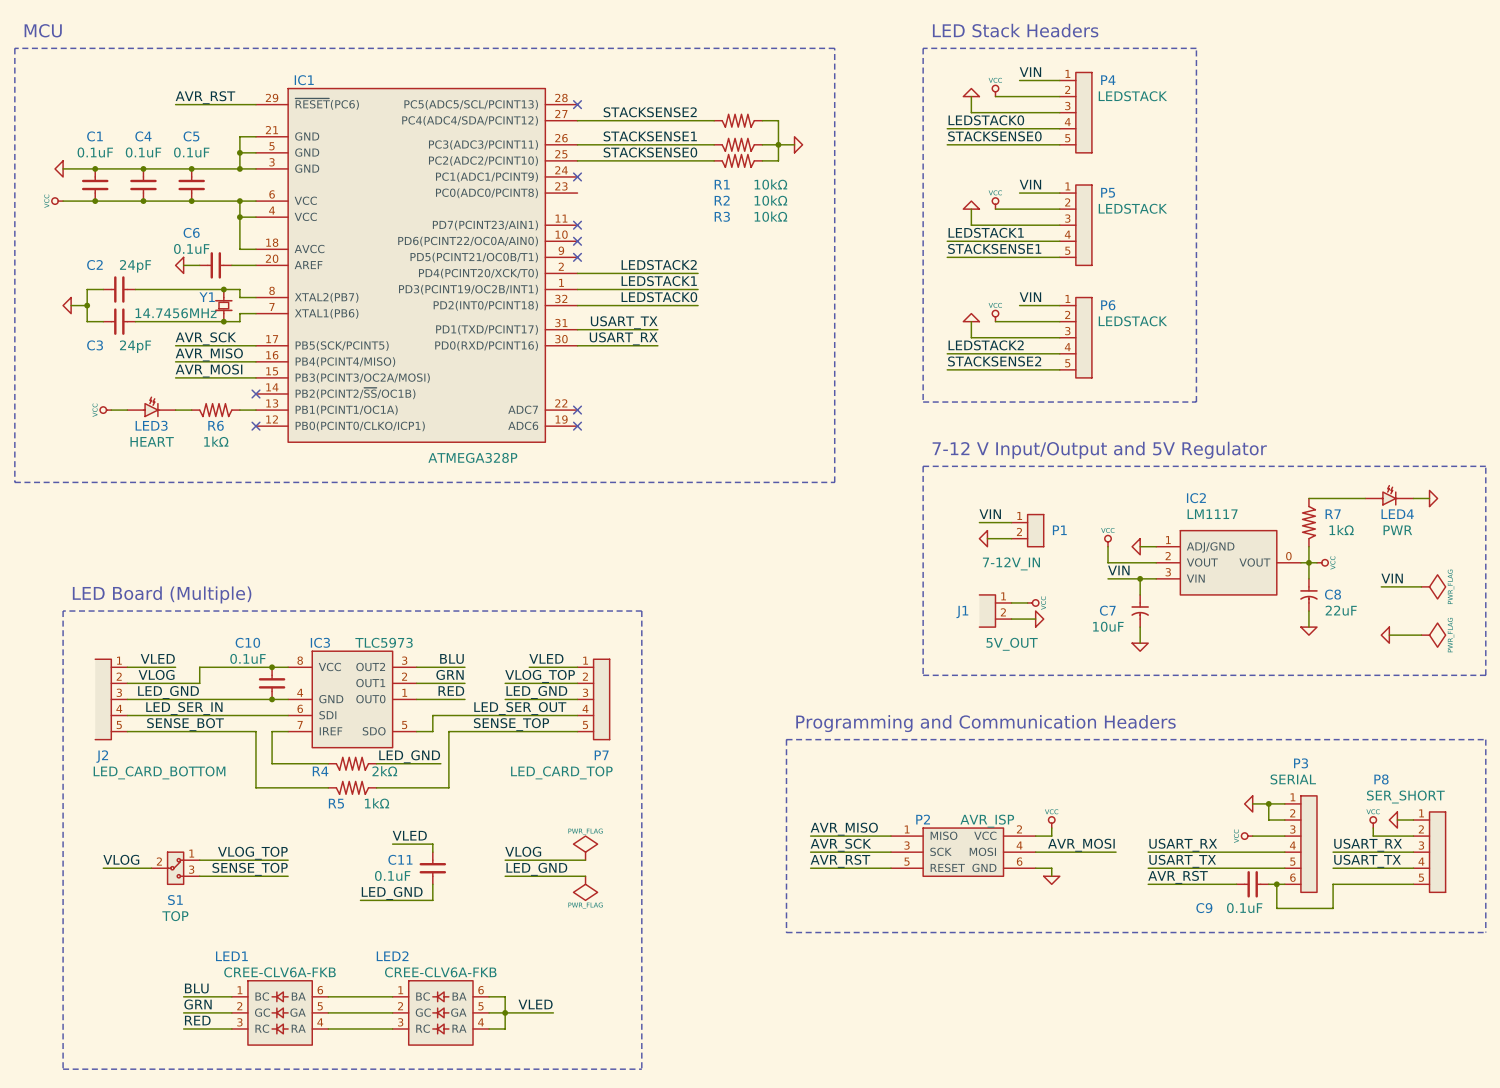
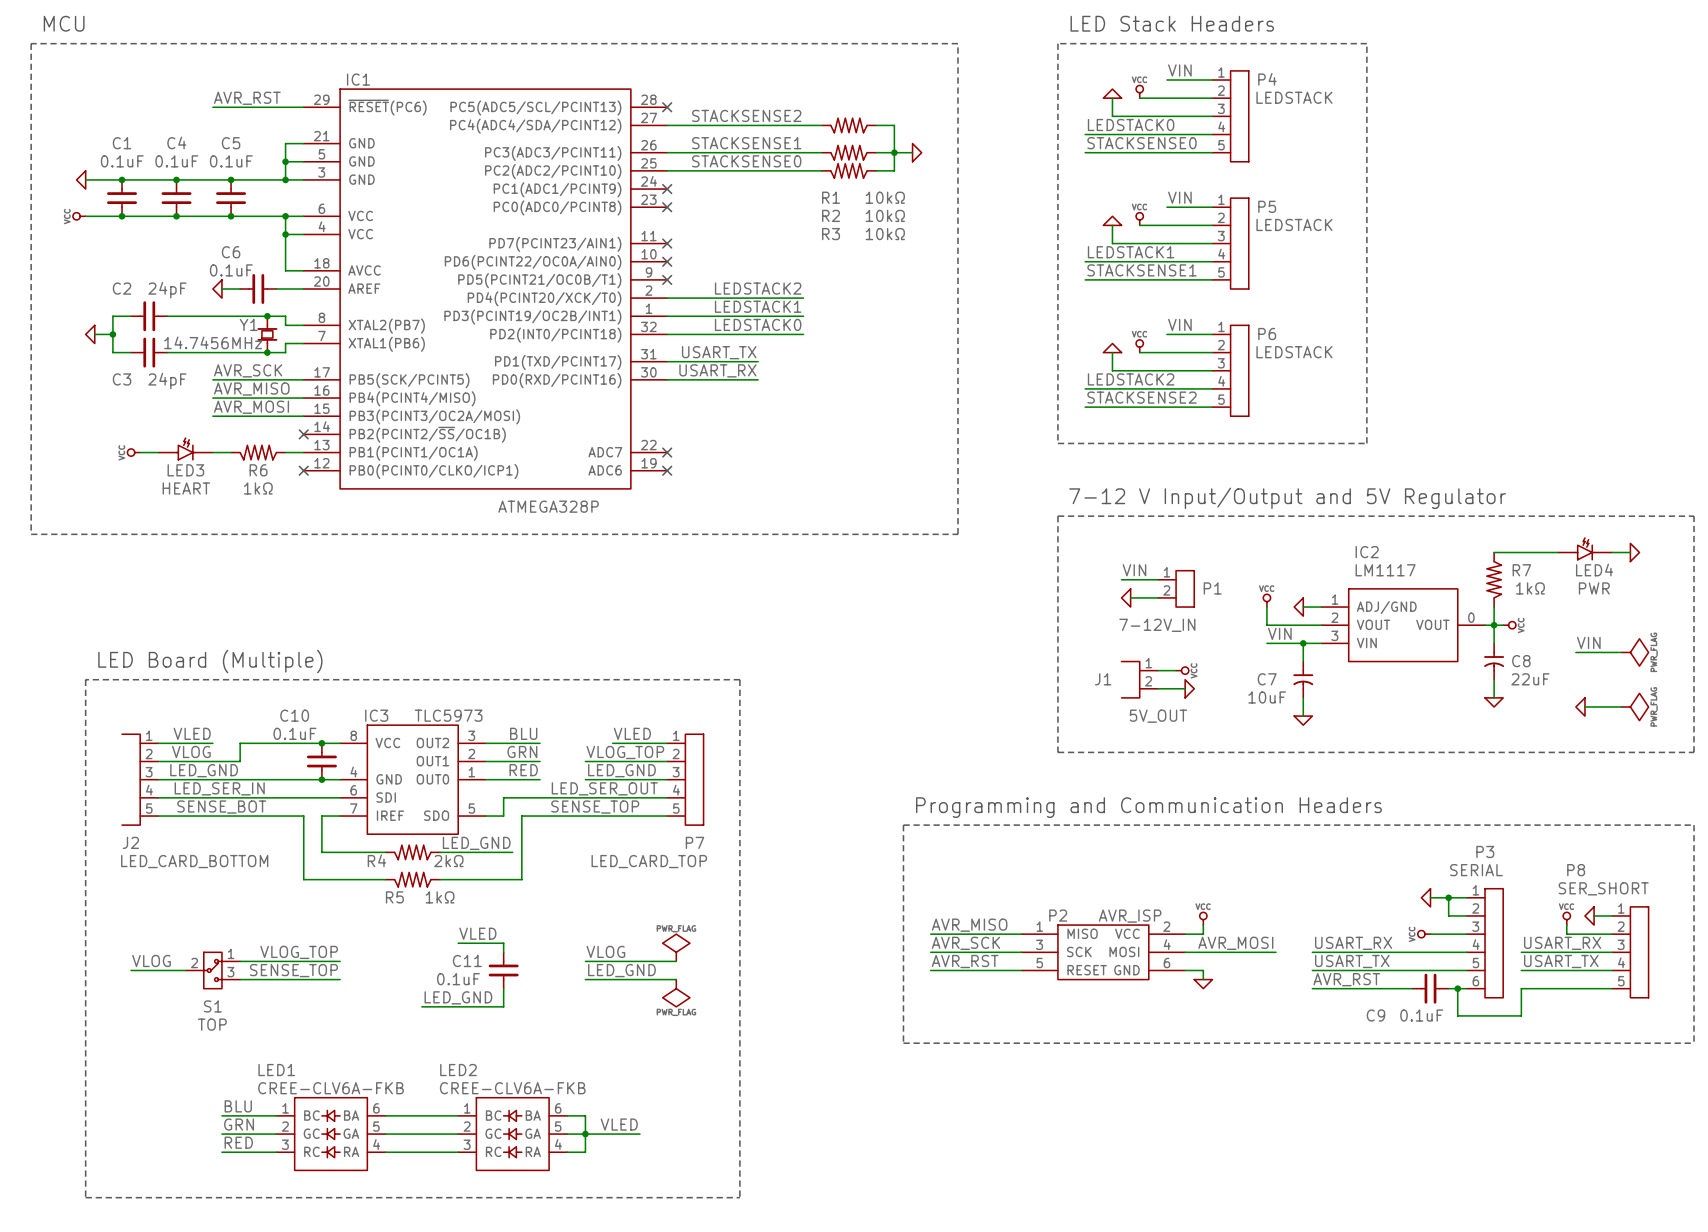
no-connect mark: none -> (667, 207)

